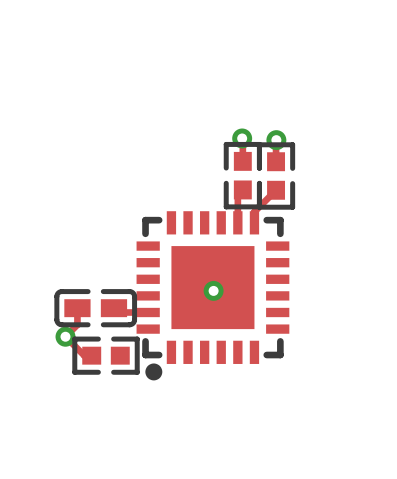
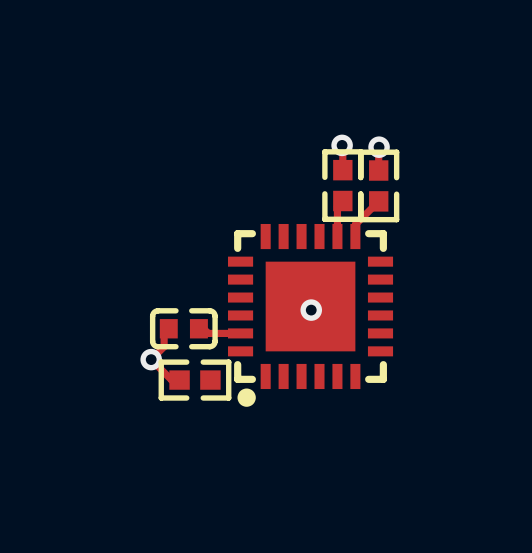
part footprint: [54, 289, 138, 328] -> [149, 308, 218, 350]

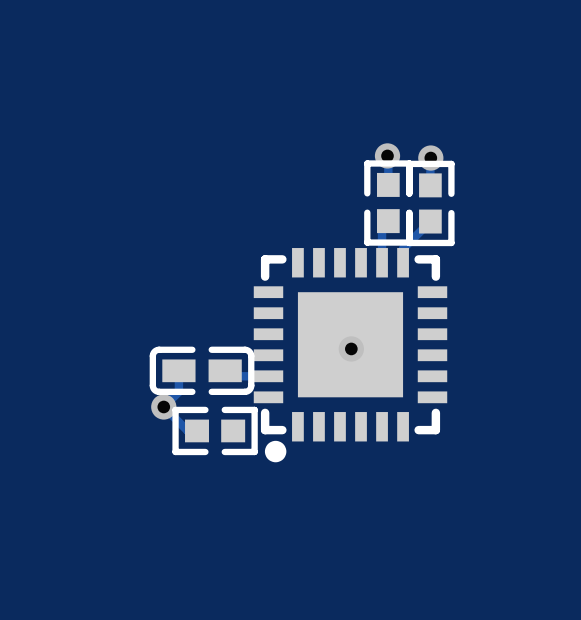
part footprint: [149, 308, 218, 350] -> [149, 346, 255, 396]

